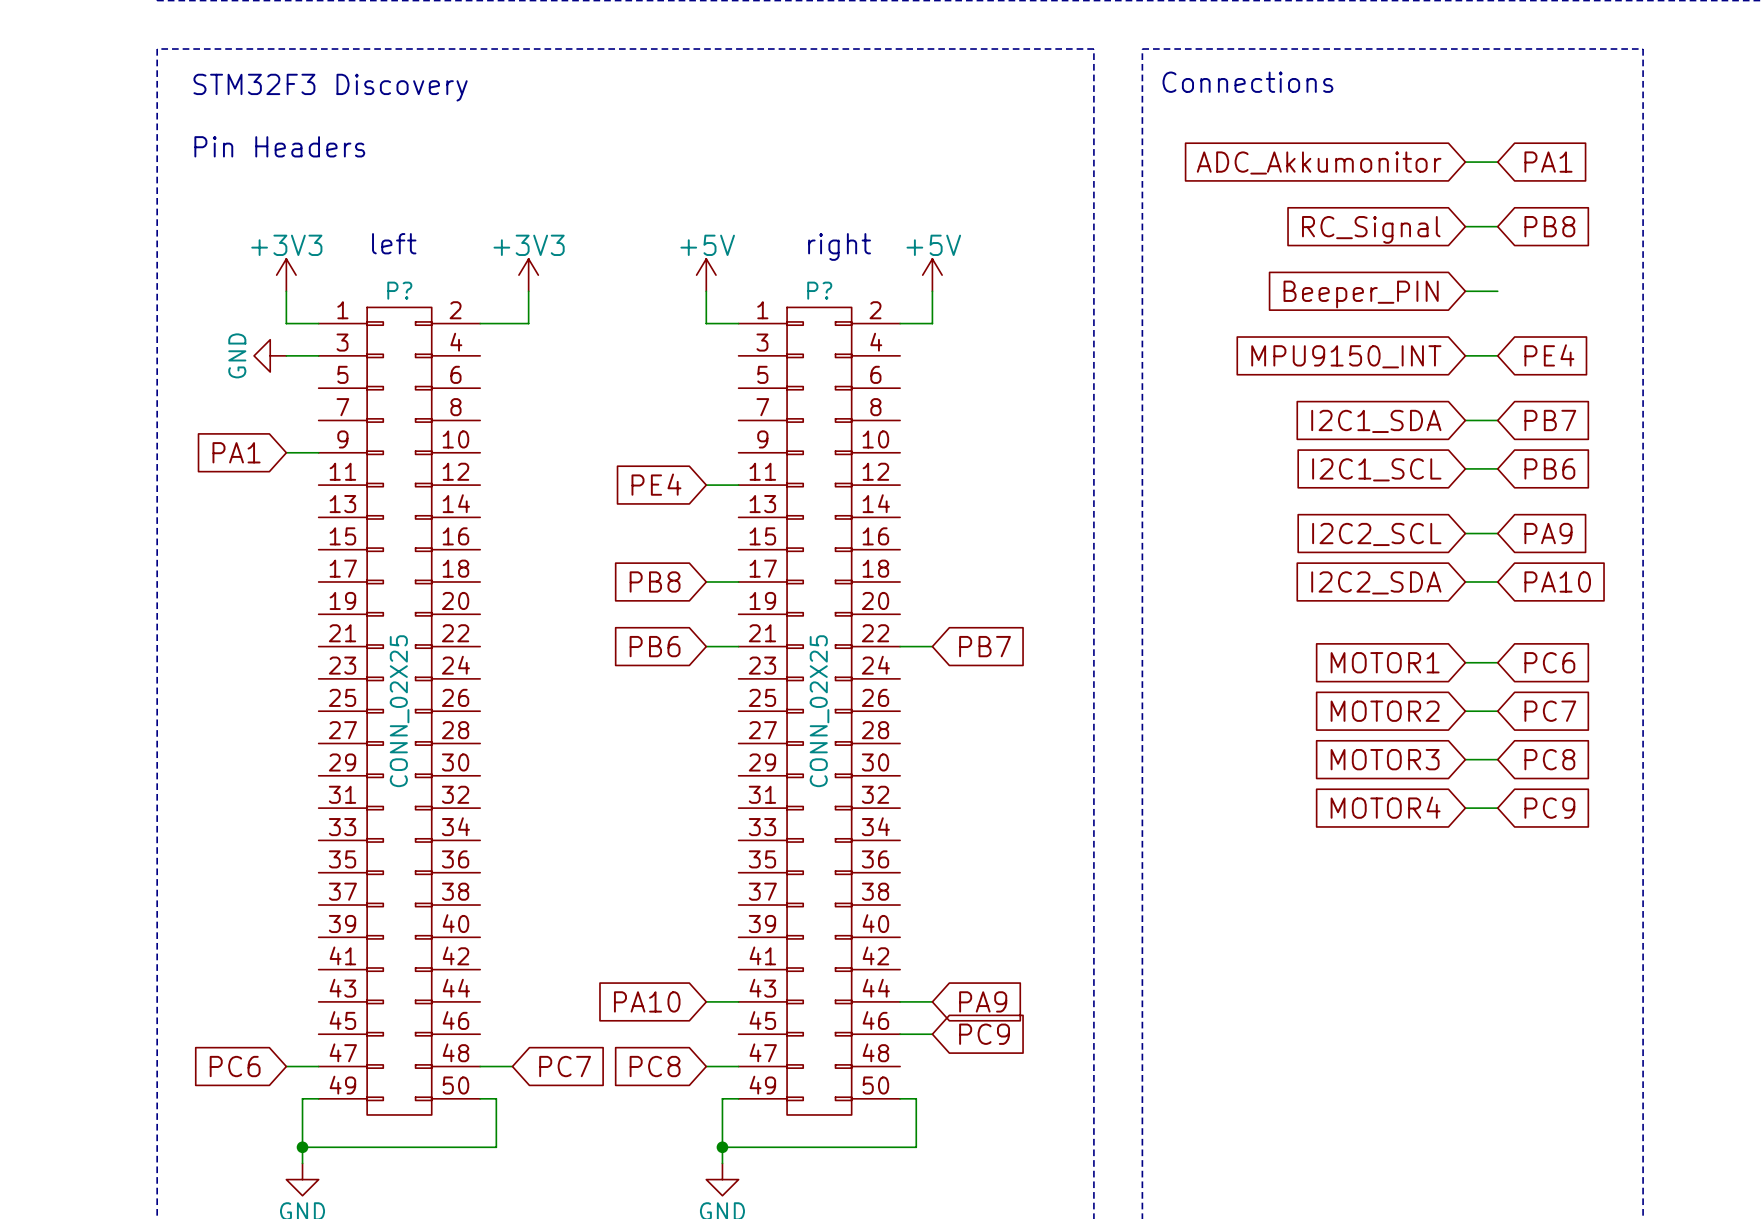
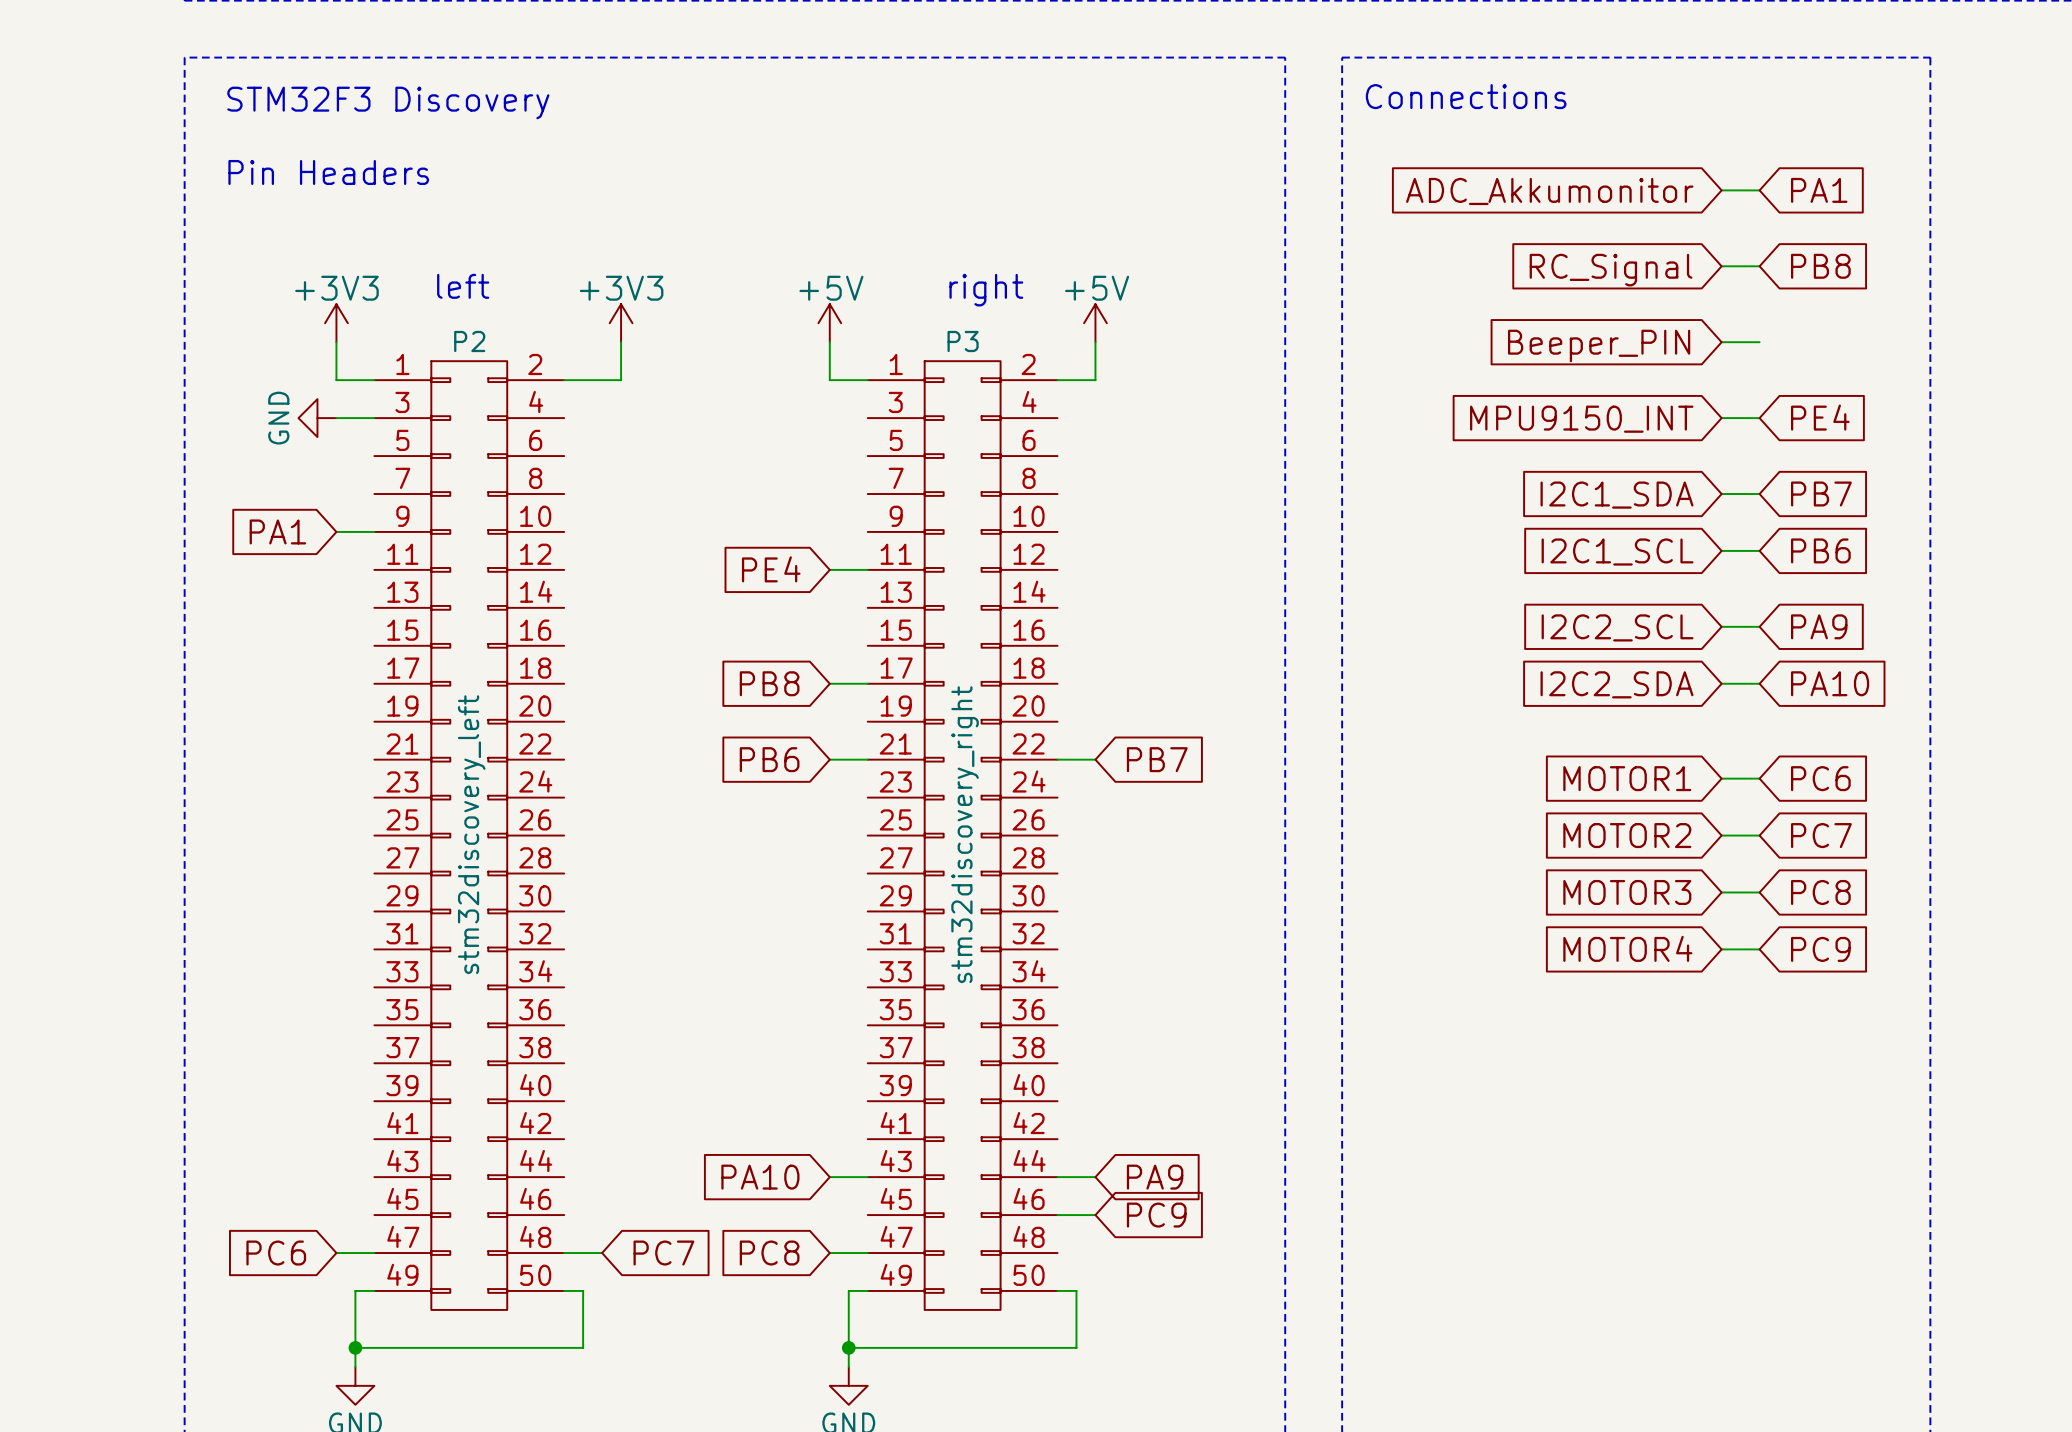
P? name: P? (399, 290) -> P2 (469, 341)
P? name: P? (819, 290) -> P3 (963, 341)
P? value: CONN_02X25 (399, 711) -> stm32discovery_left (471, 834)
P? value: CONN_02X25 (819, 711) -> stm32discovery_right (965, 834)

